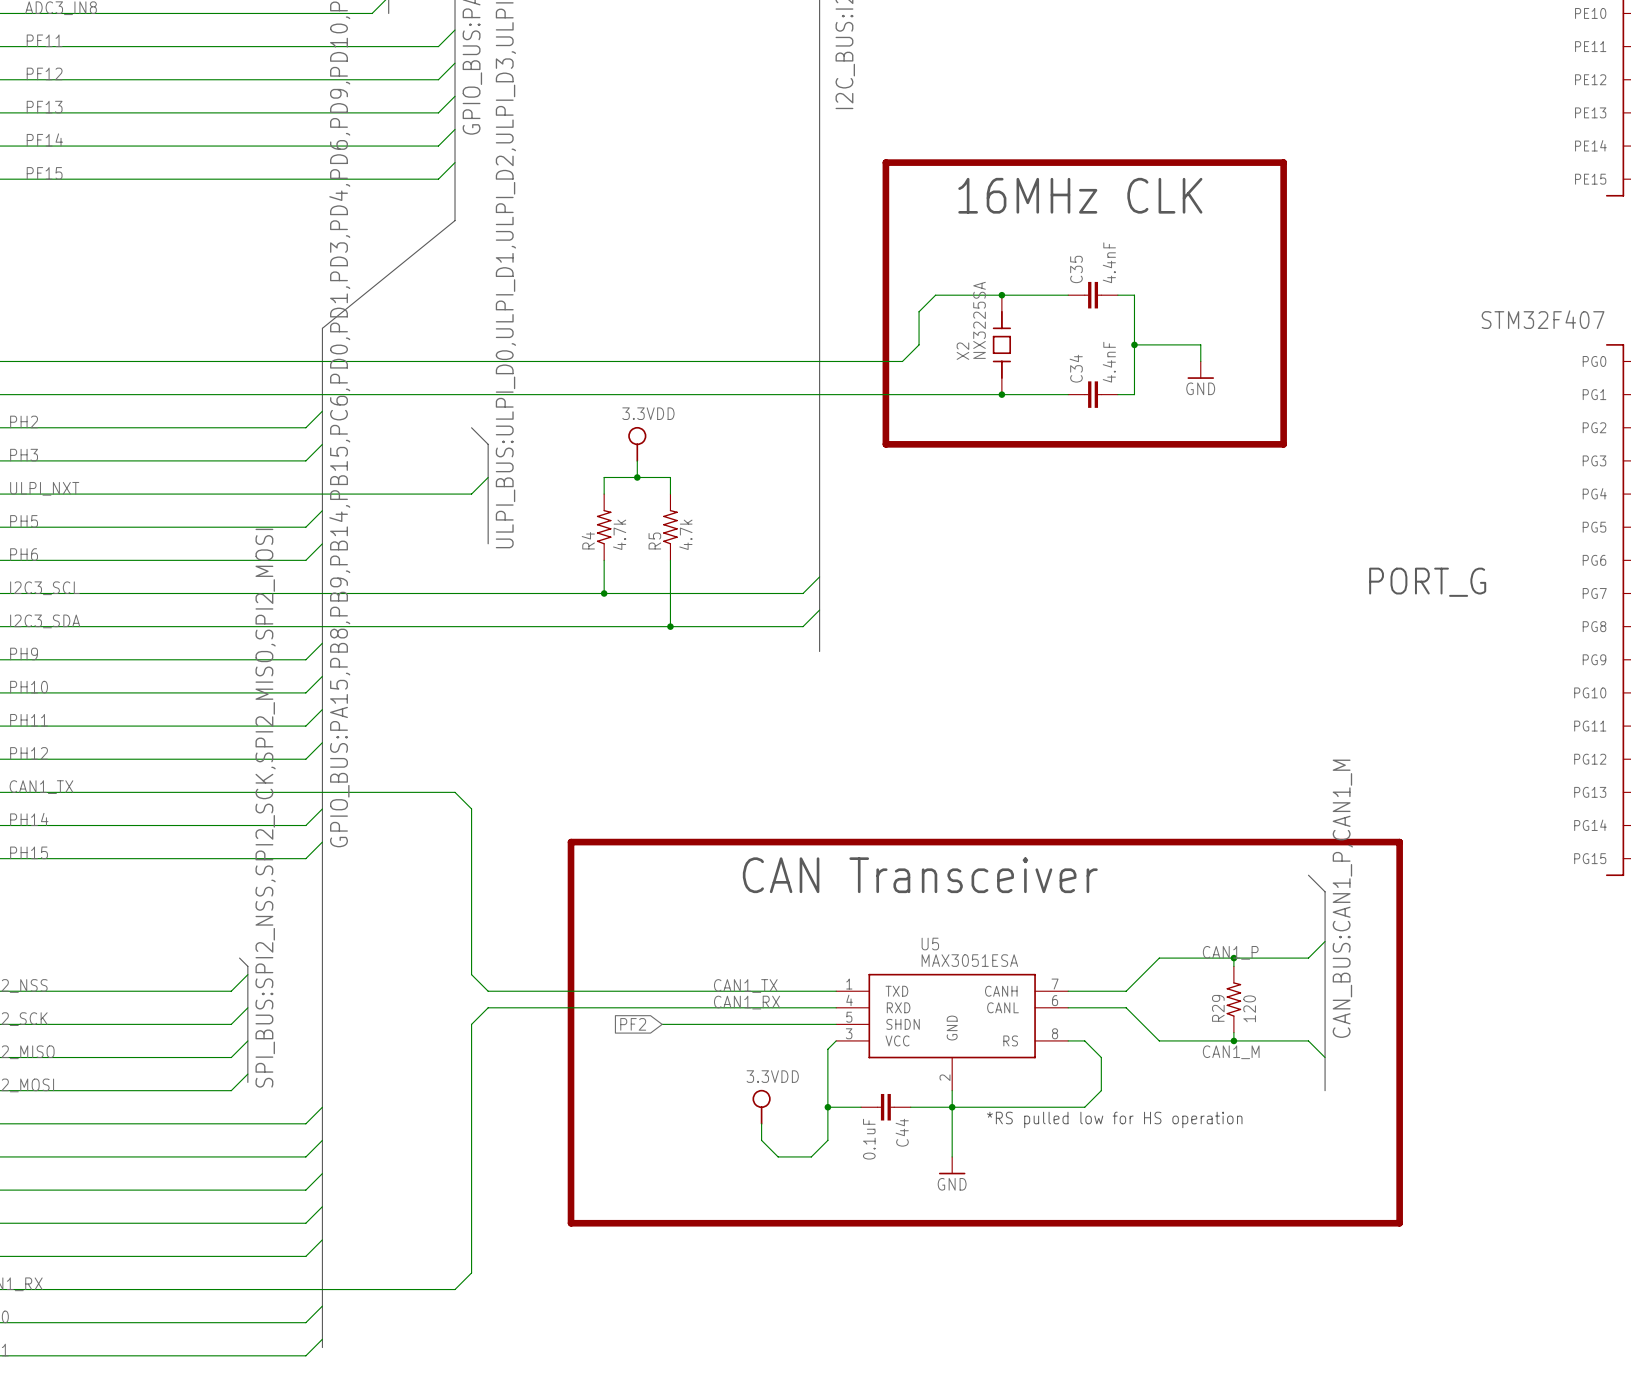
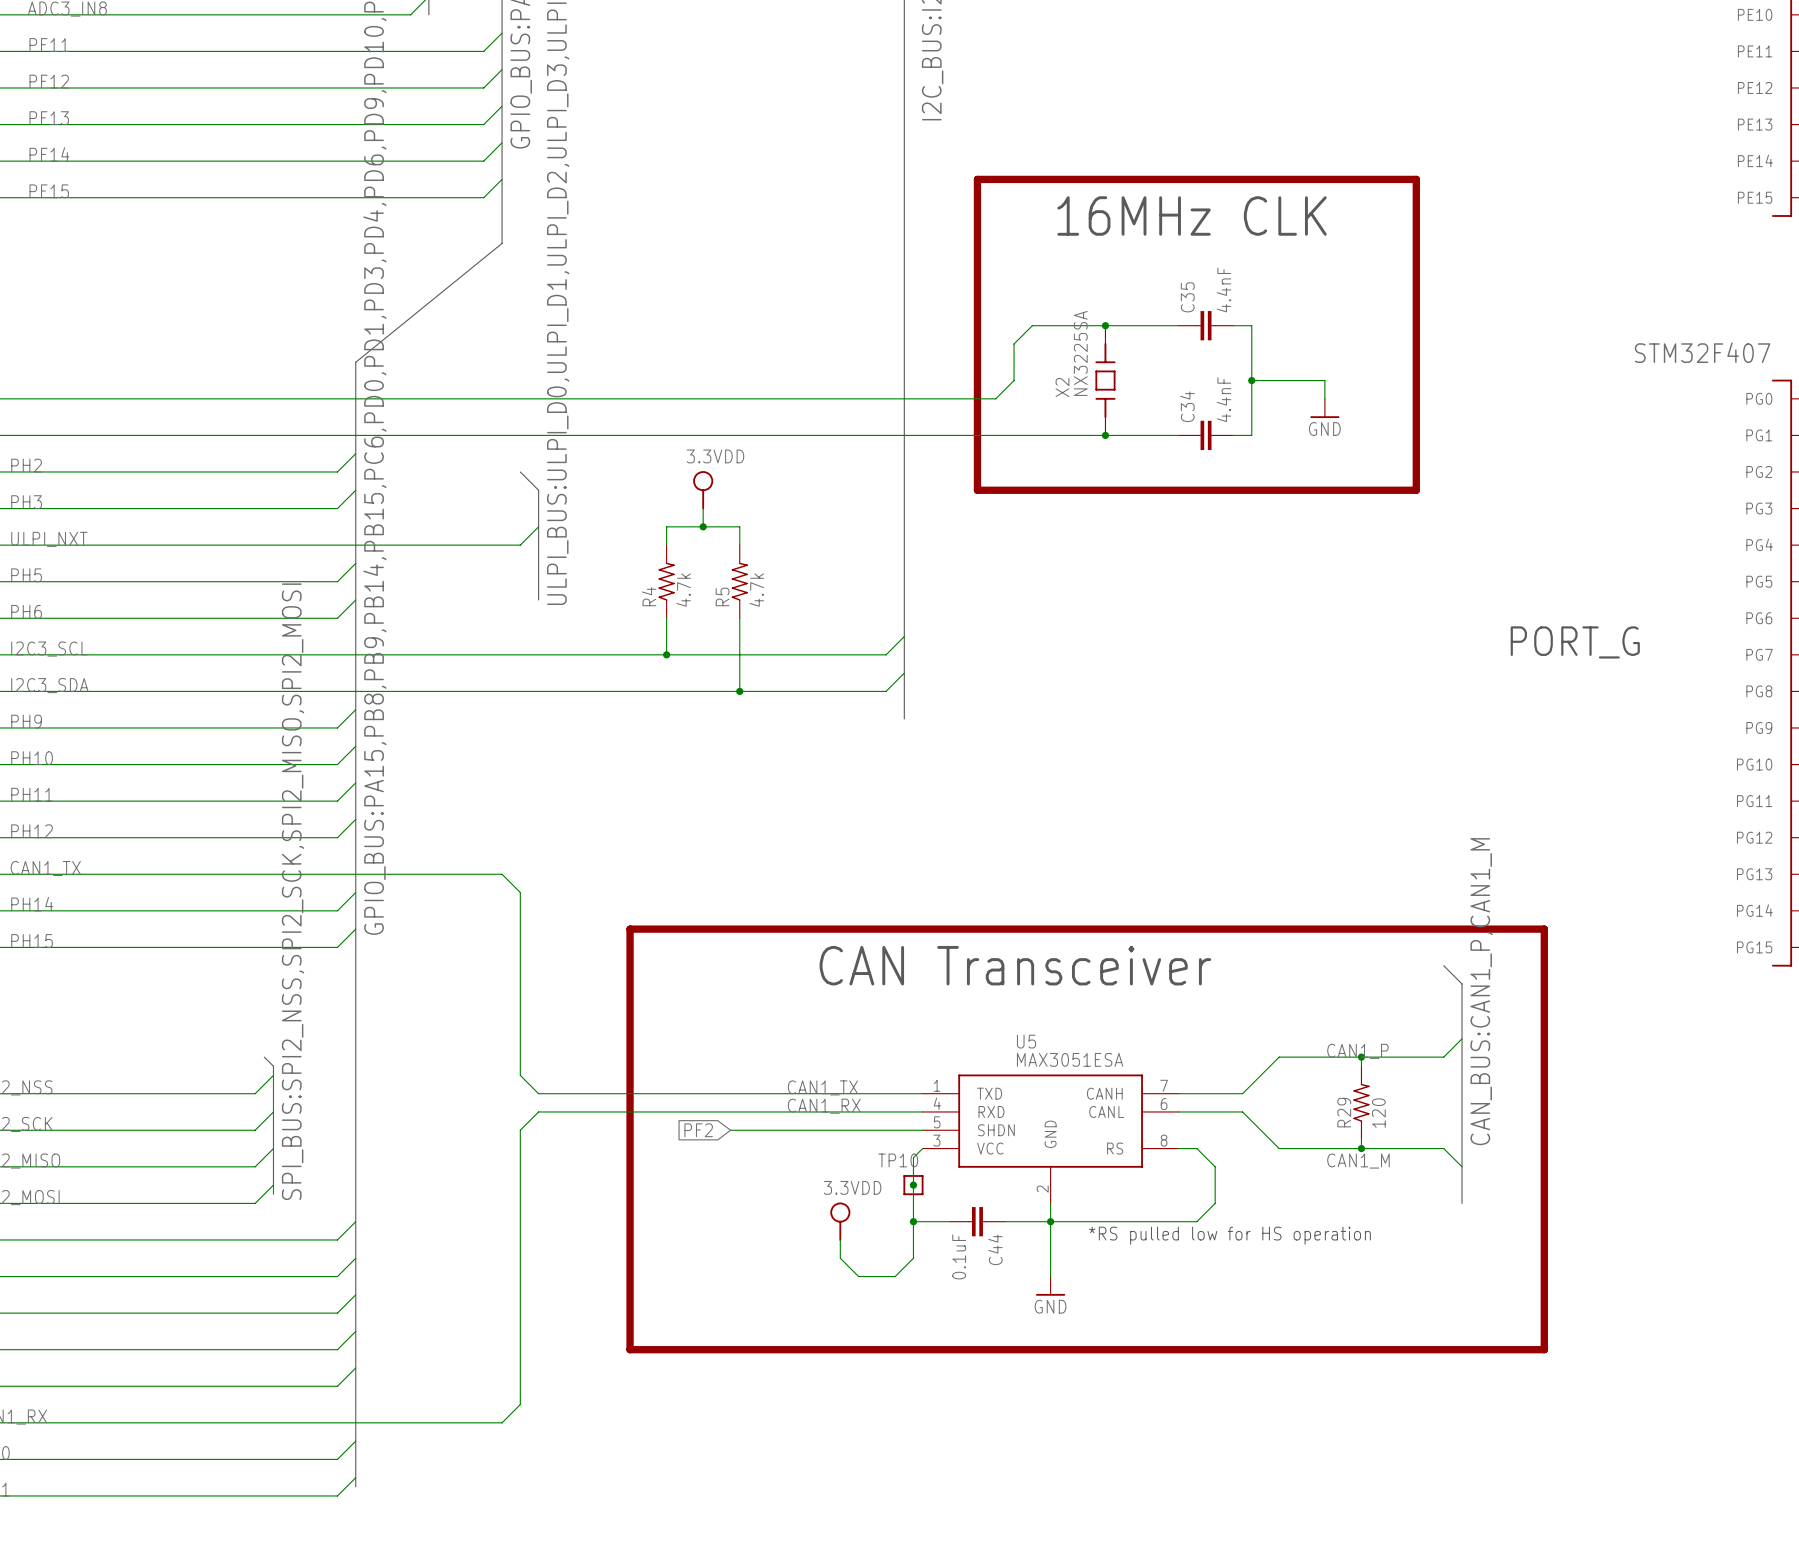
TP10: none -> (913, 1185)
junction: none -> (913, 1185)

